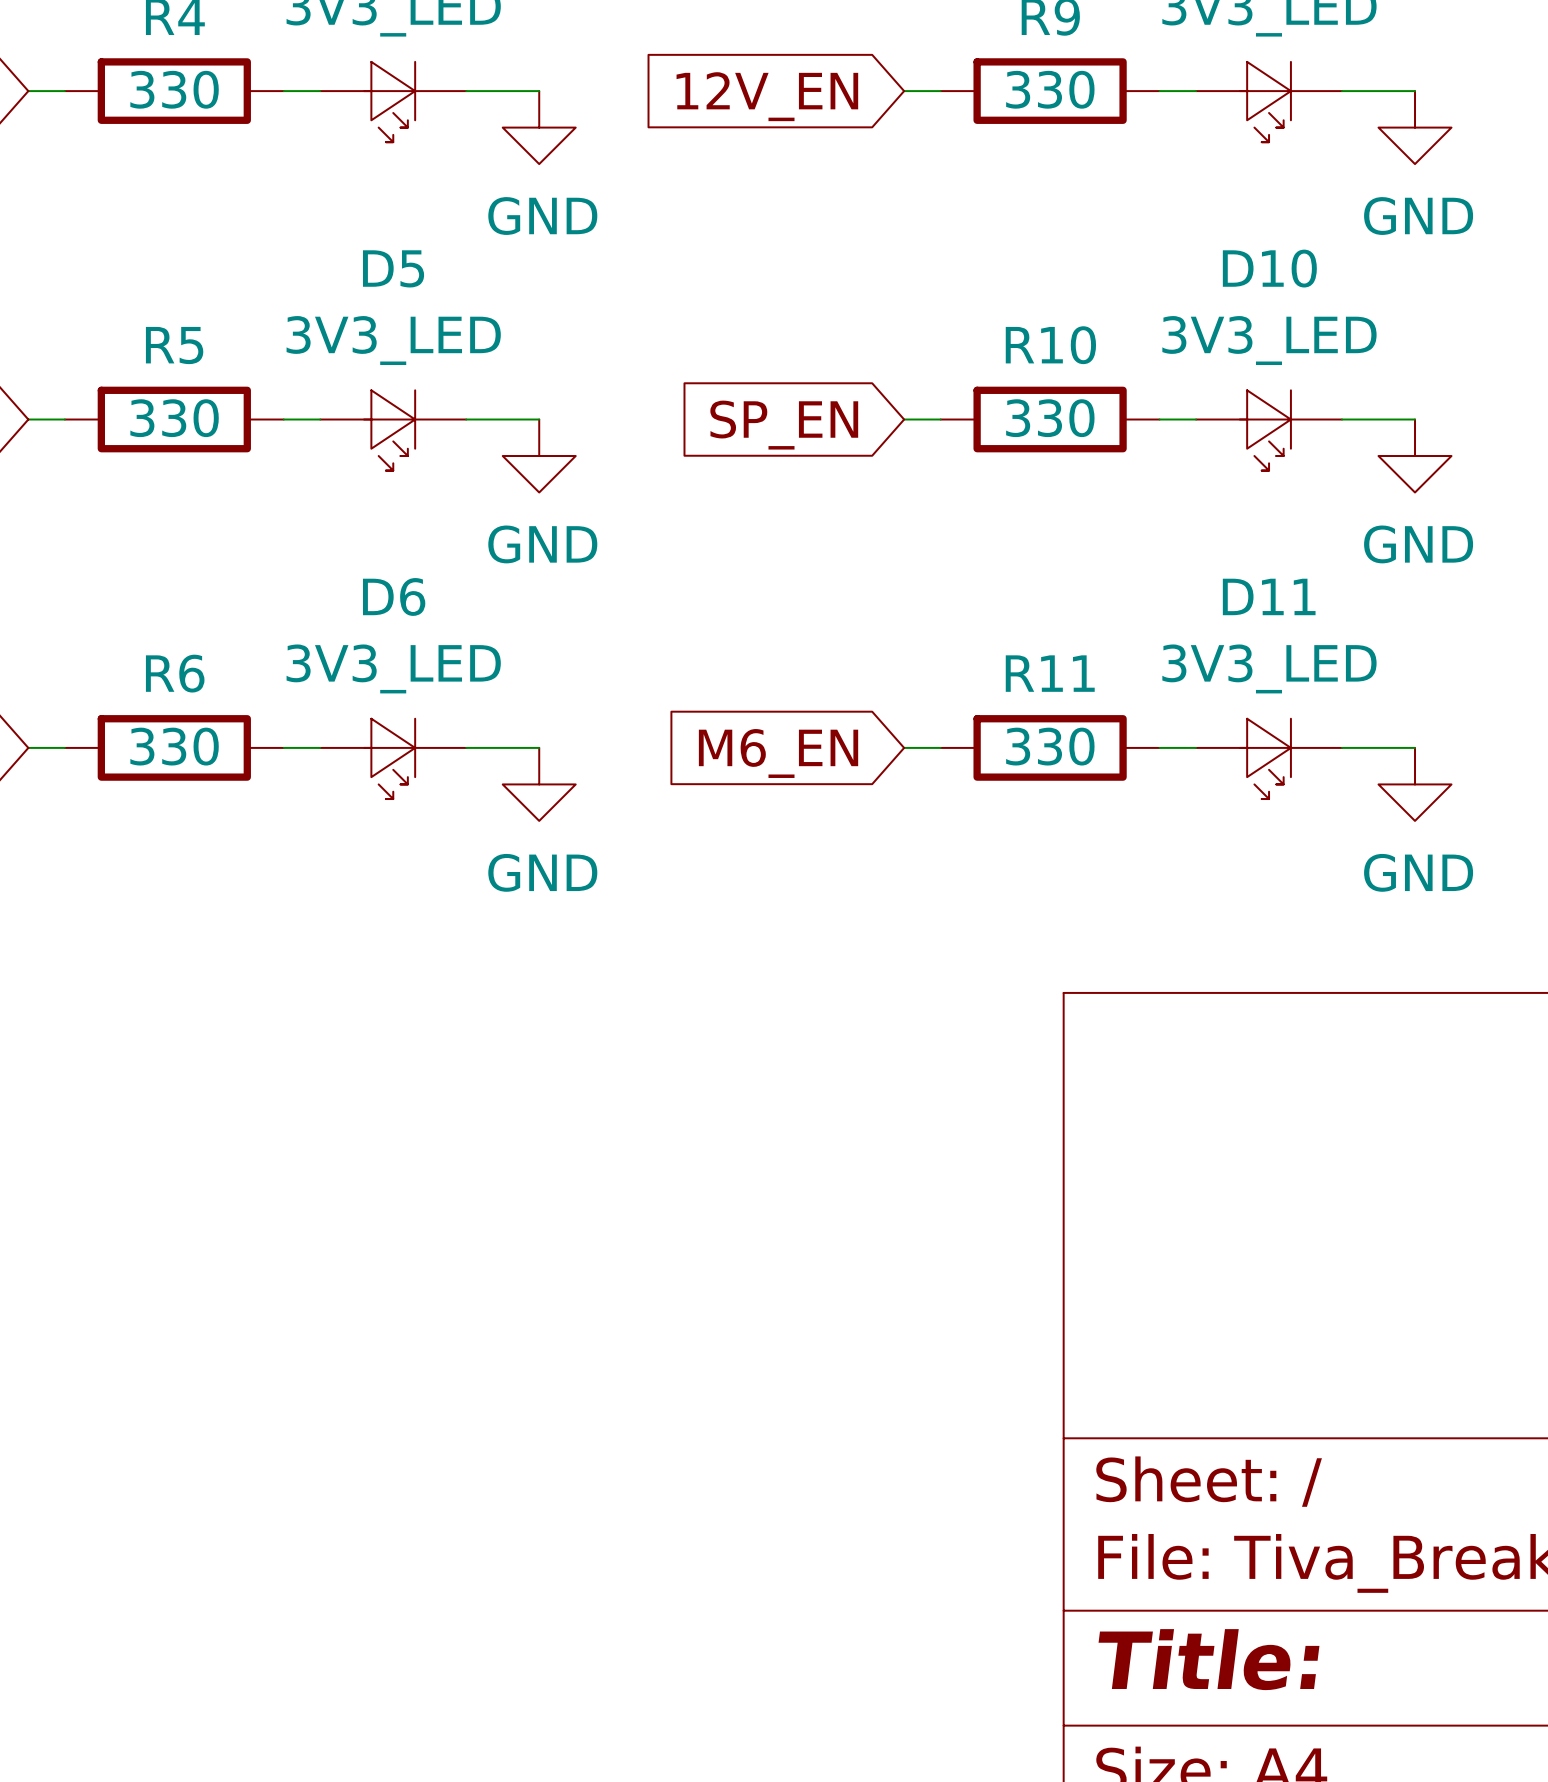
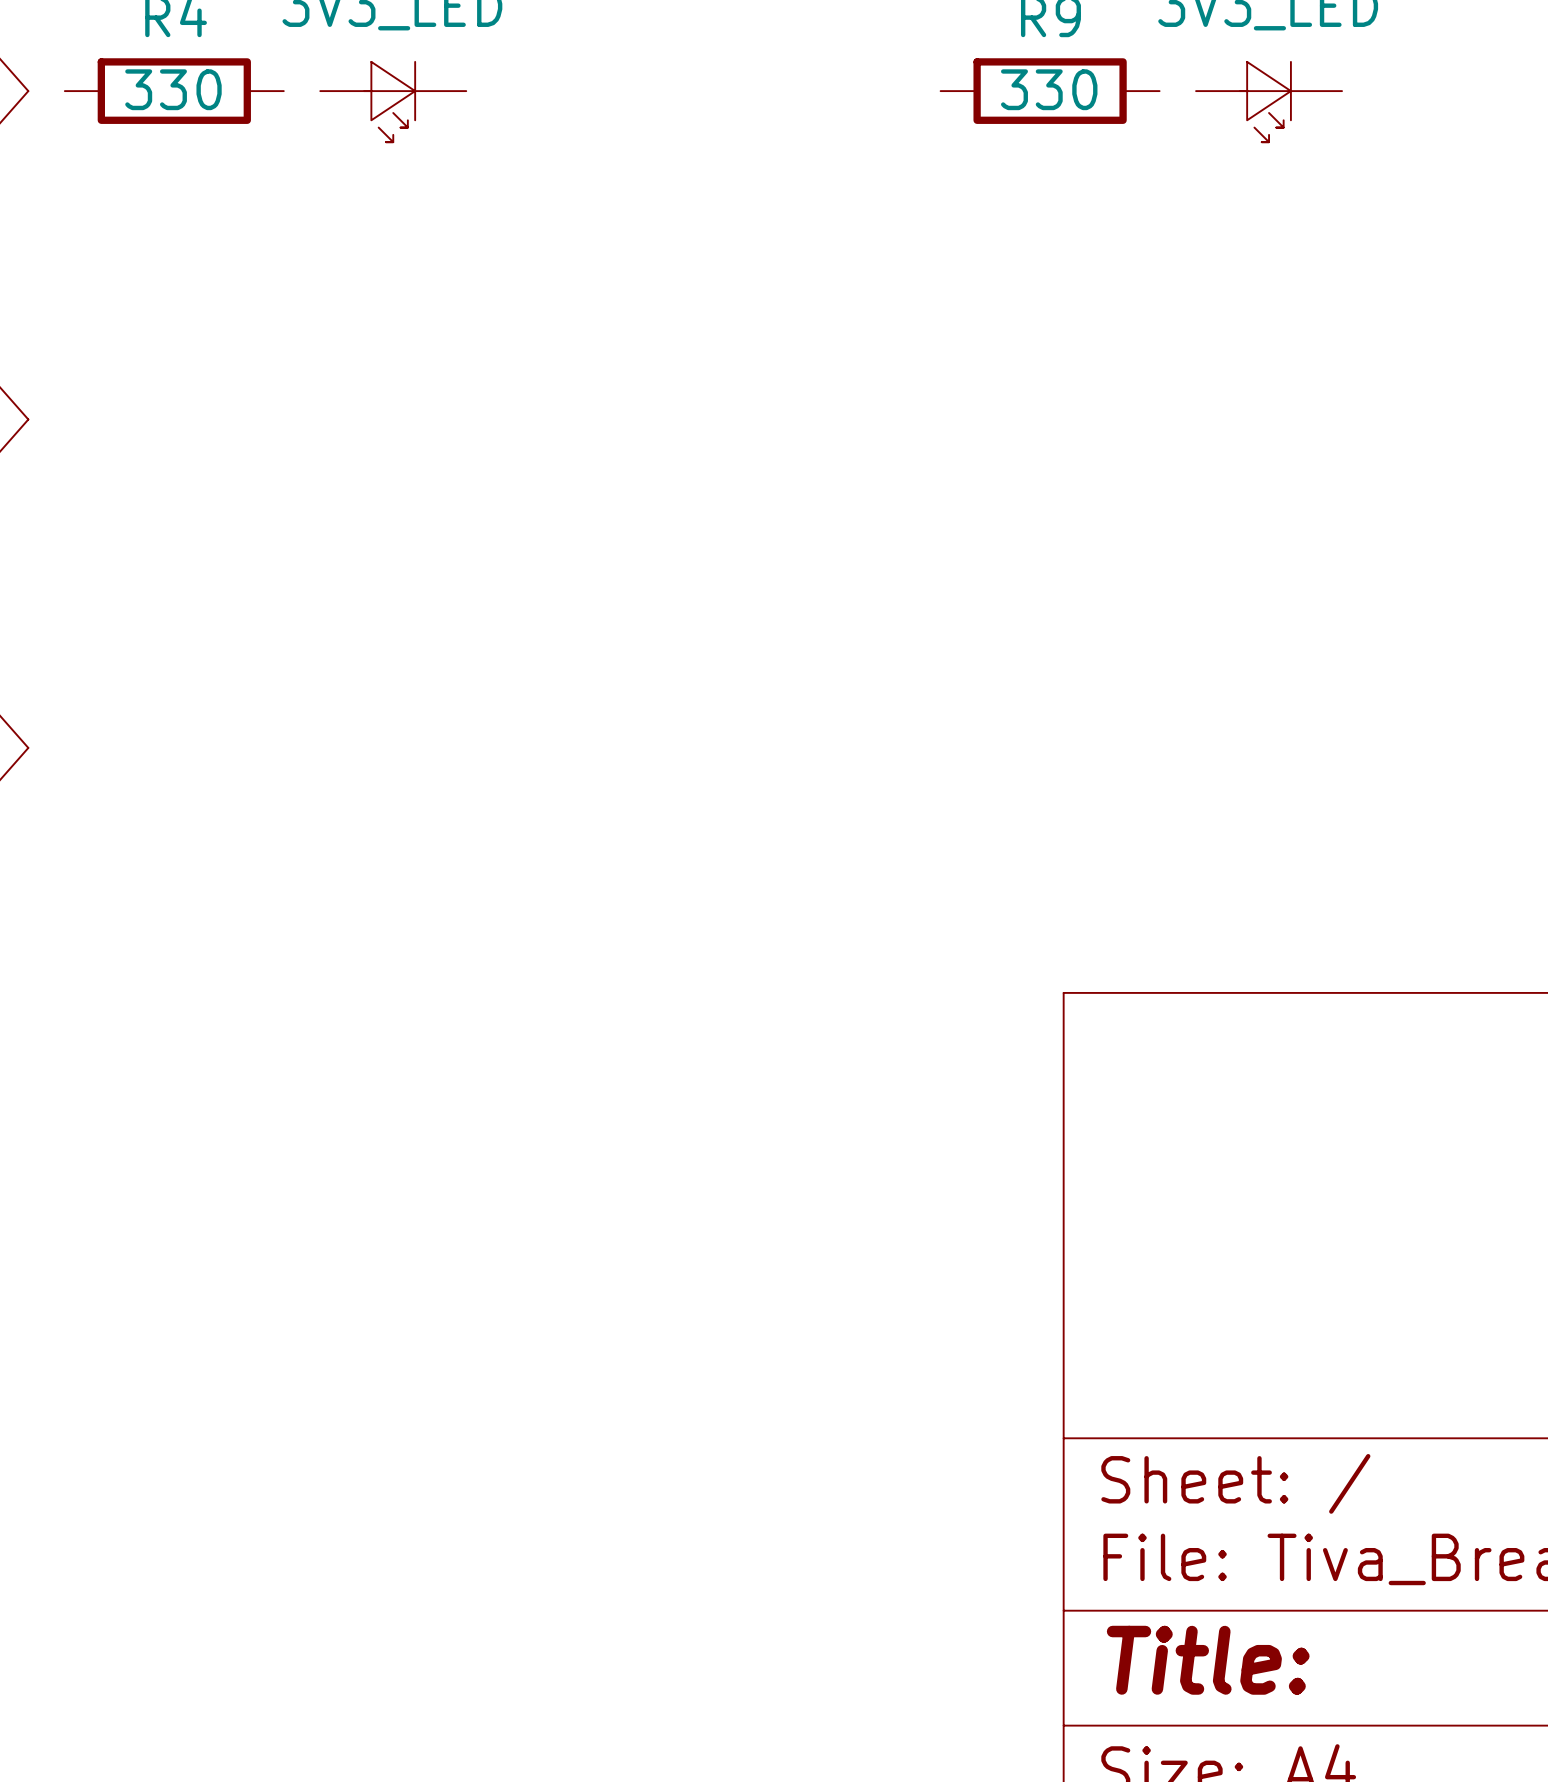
wire: (28, 91) (64, 91) -> none
wire: (283, 91) (320, 91) -> none
wire: (466, 91) (539, 91) -> none
wire: (904, 91) (940, 91) -> none
wire: (1159, 91) (1196, 91) -> none
wire: (1342, 91) (1415, 91) -> none
global label: 12V_EN (767, 96) -> none
power symbol: GND (539, 127) -> none
power symbol: GND (1415, 127) -> none
wire: (28, 419) (64, 419) -> none
R5: 330 (174, 419) -> none
wire: (283, 419) (320, 419) -> none
wire: (466, 419) (539, 419) -> none
wire: (904, 419) (940, 419) -> none
R10: 330 (1050, 419) -> none
wire: (1159, 419) (1196, 419) -> none
wire: (1342, 419) (1415, 419) -> none
global label: SP_EN (784, 425) -> none
D5: 3V3_LED (393, 430) -> none
D10: 3V3_LED (1269, 430) -> none
power symbol: GND (539, 456) -> none
power symbol: GND (1415, 456) -> none
wire: (28, 747) (64, 747) -> none
R6: 330 (174, 747) -> none
wire: (283, 747) (320, 747) -> none
wire: (466, 747) (539, 747) -> none
wire: (904, 747) (940, 747) -> none
R11: 330 (1050, 747) -> none
wire: (1159, 747) (1196, 747) -> none
wire: (1342, 747) (1415, 747) -> none
global label: M6_EN (778, 753) -> none
D6: 3V3_LED (393, 758) -> none
D11: 3V3_LED (1269, 758) -> none
power symbol: GND (539, 784) -> none
power symbol: GND (1415, 784) -> none

